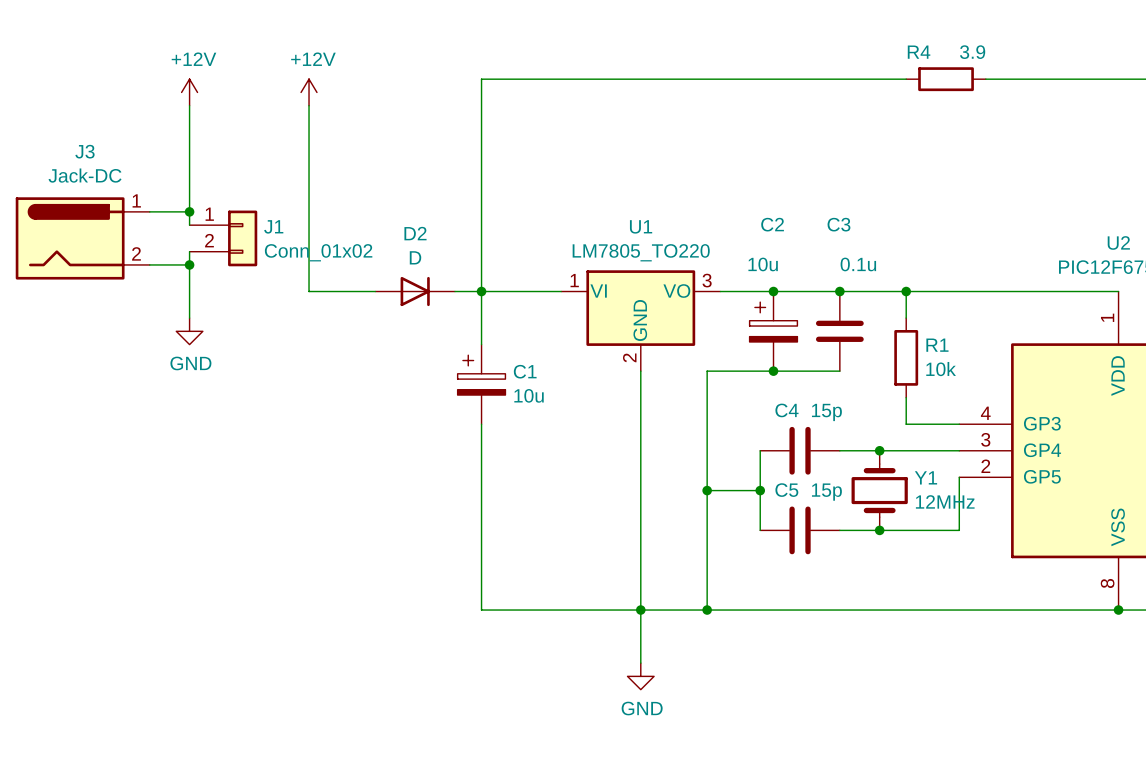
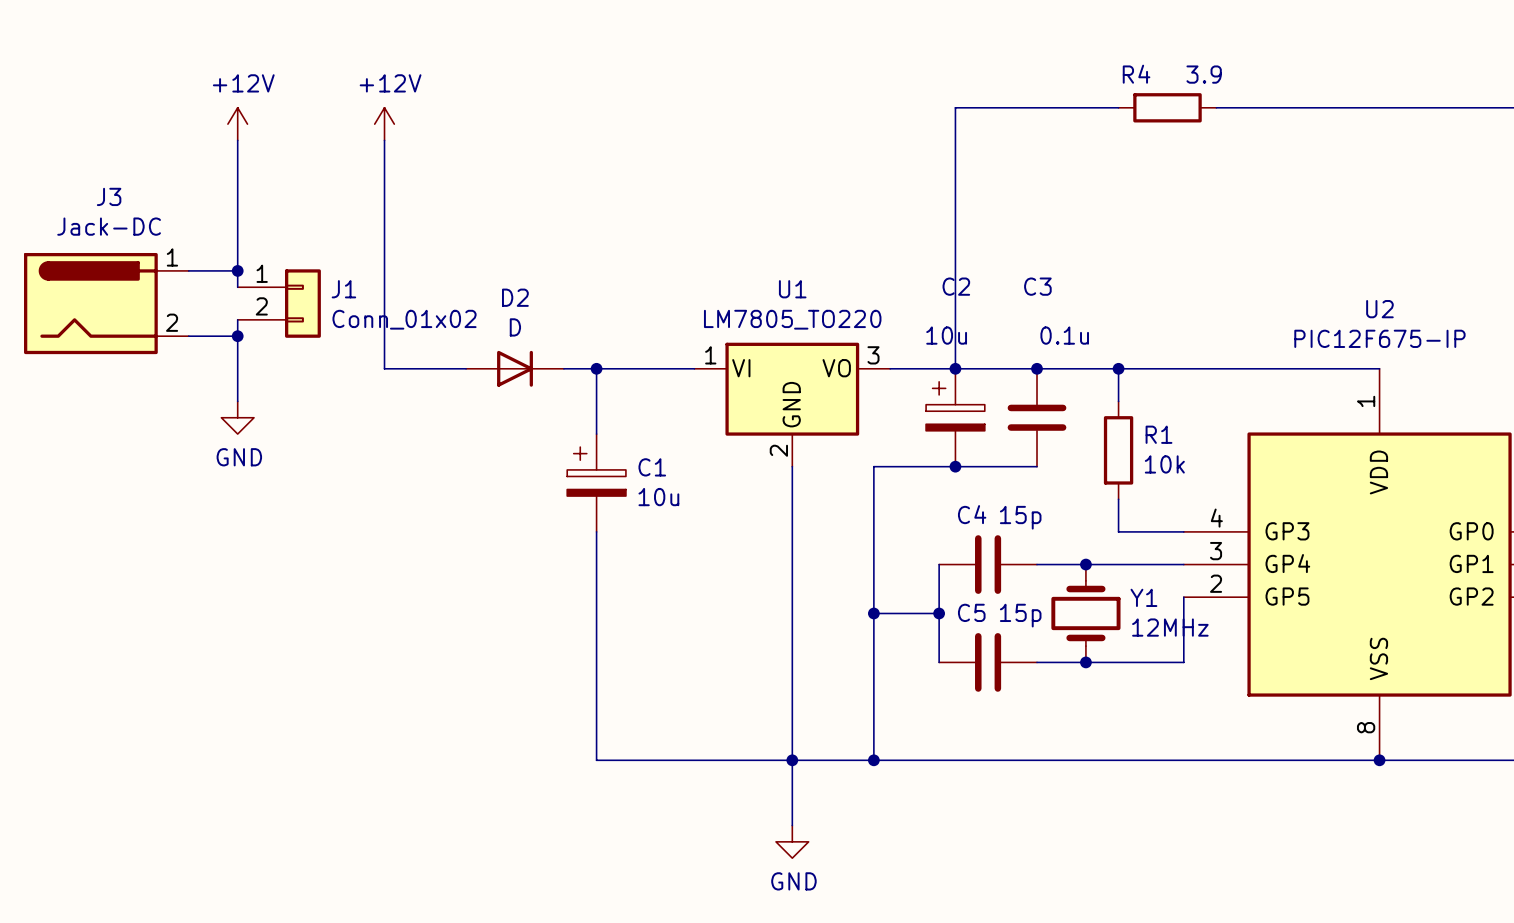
wire: (773, 79) (481, 79) (481, 291) -> (955, 107) (955, 368)

